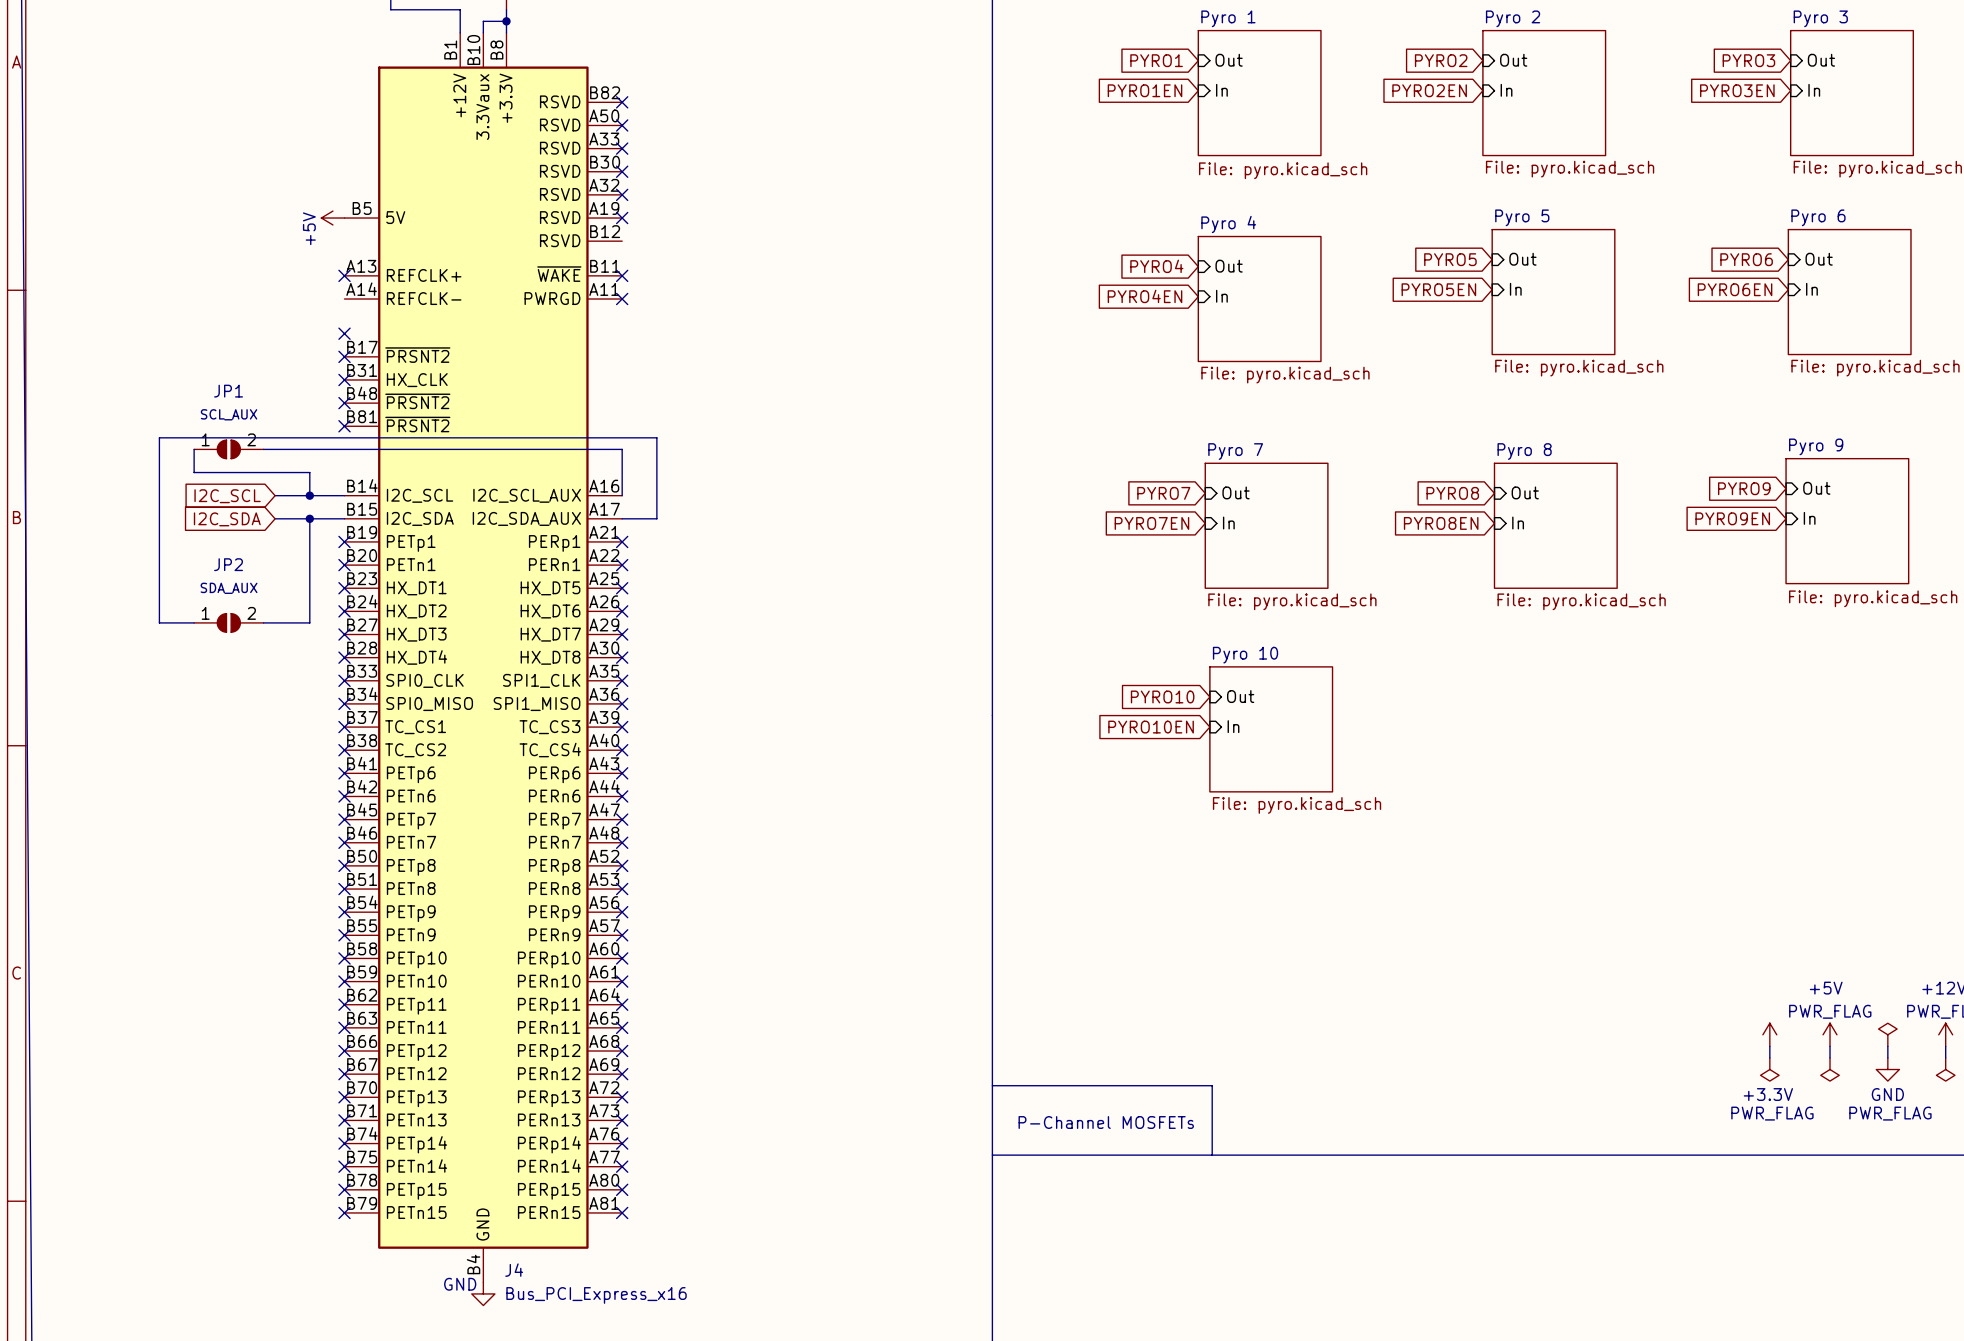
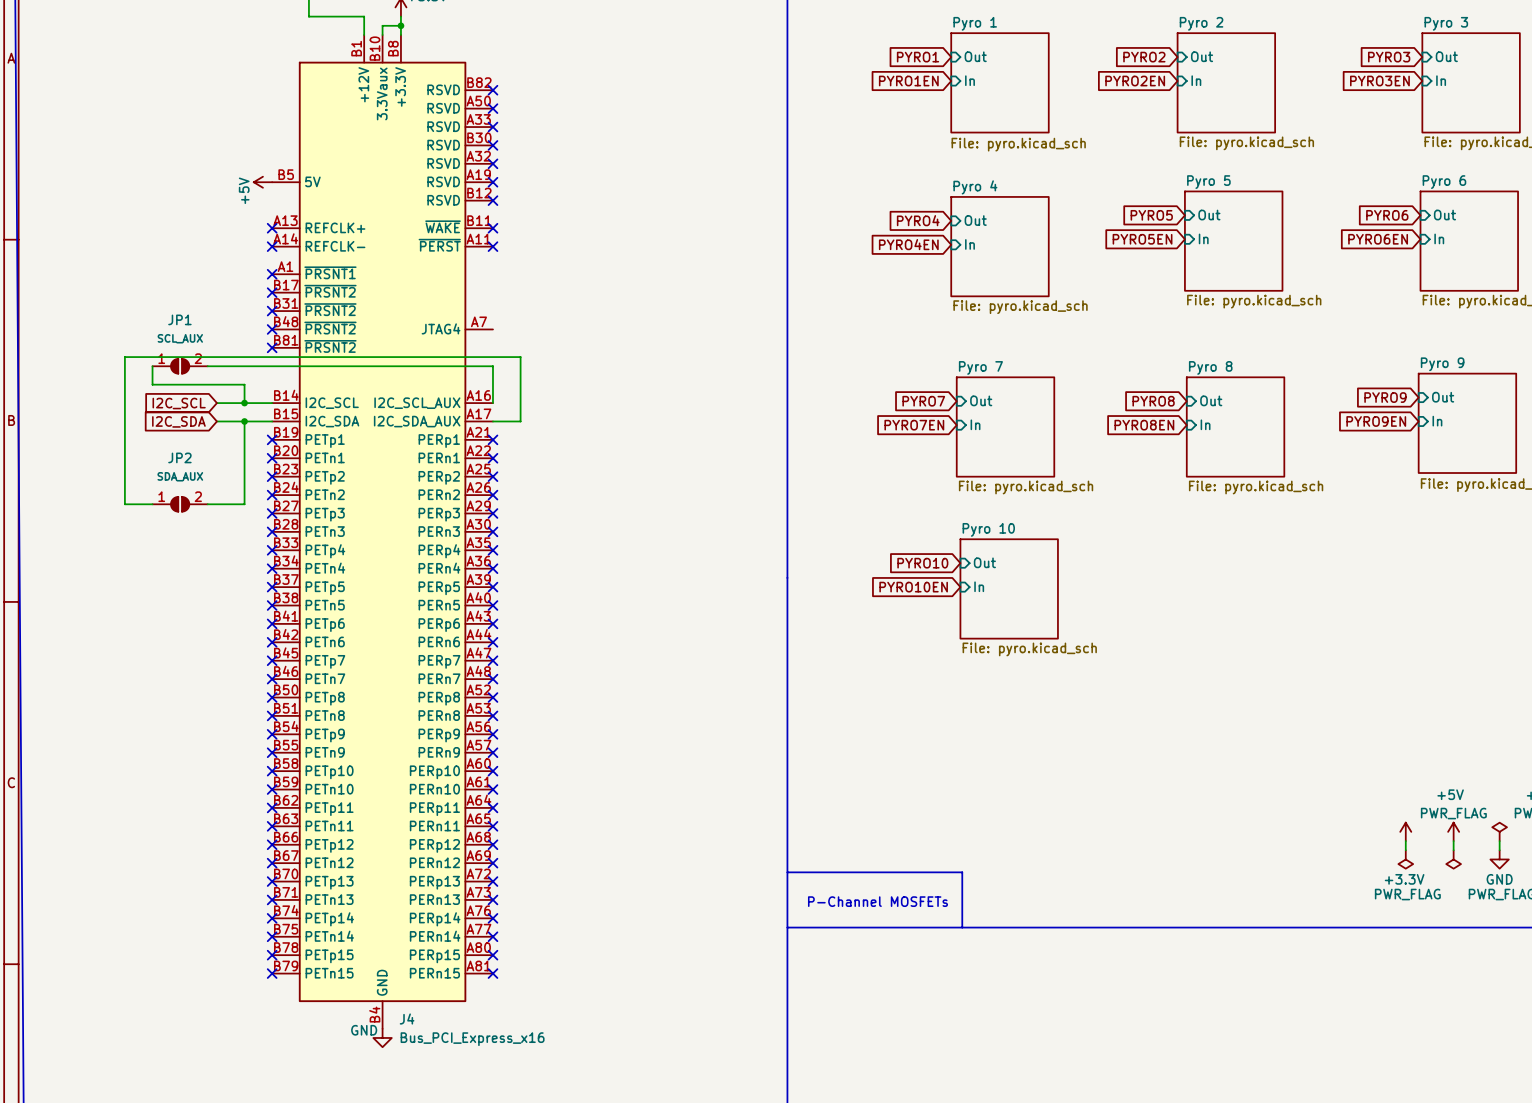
J4 symbol: [344, 32, 623, 1283] -> [272, 35, 493, 1029]
no-connect mark: none -> (492, 200)
no-connect mark: none -> (272, 246)

